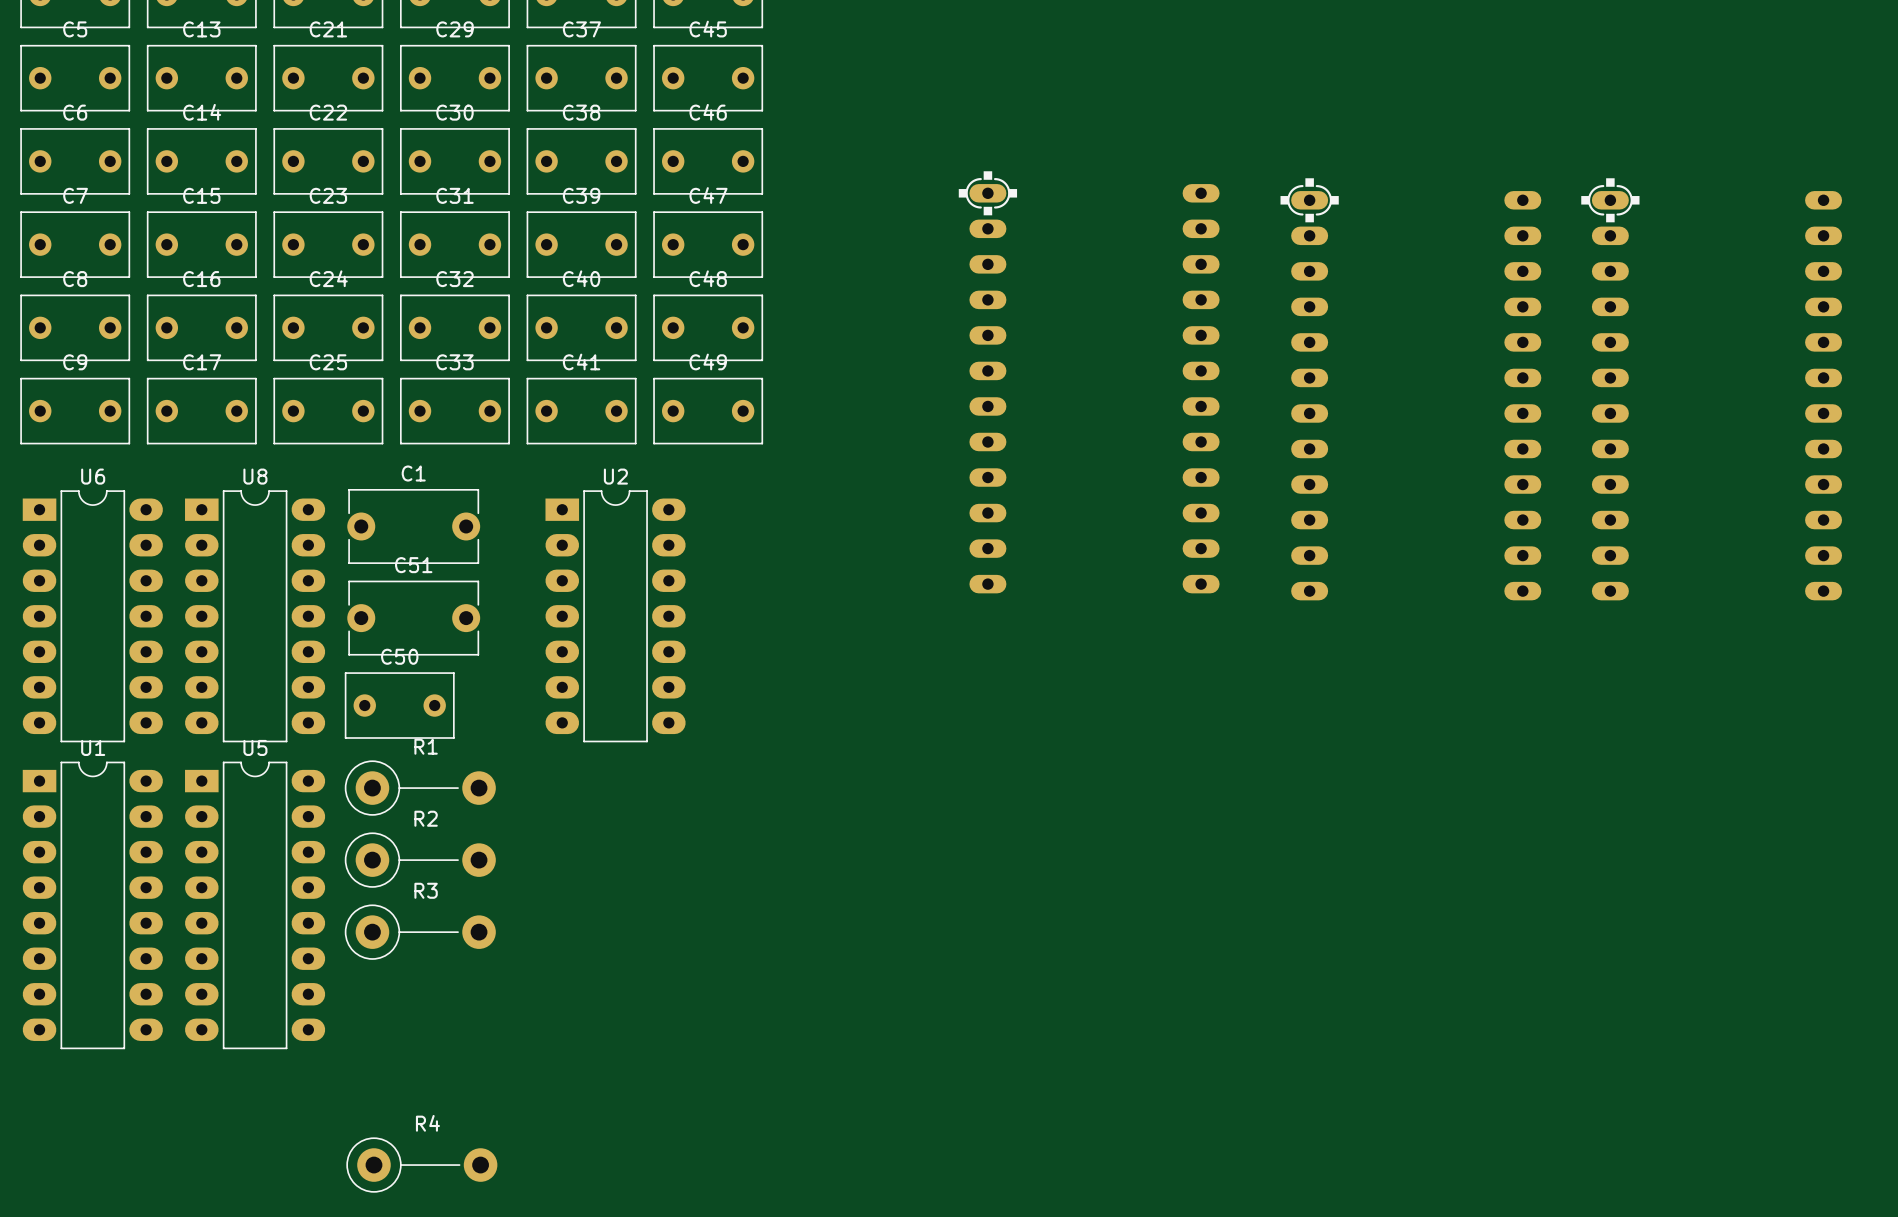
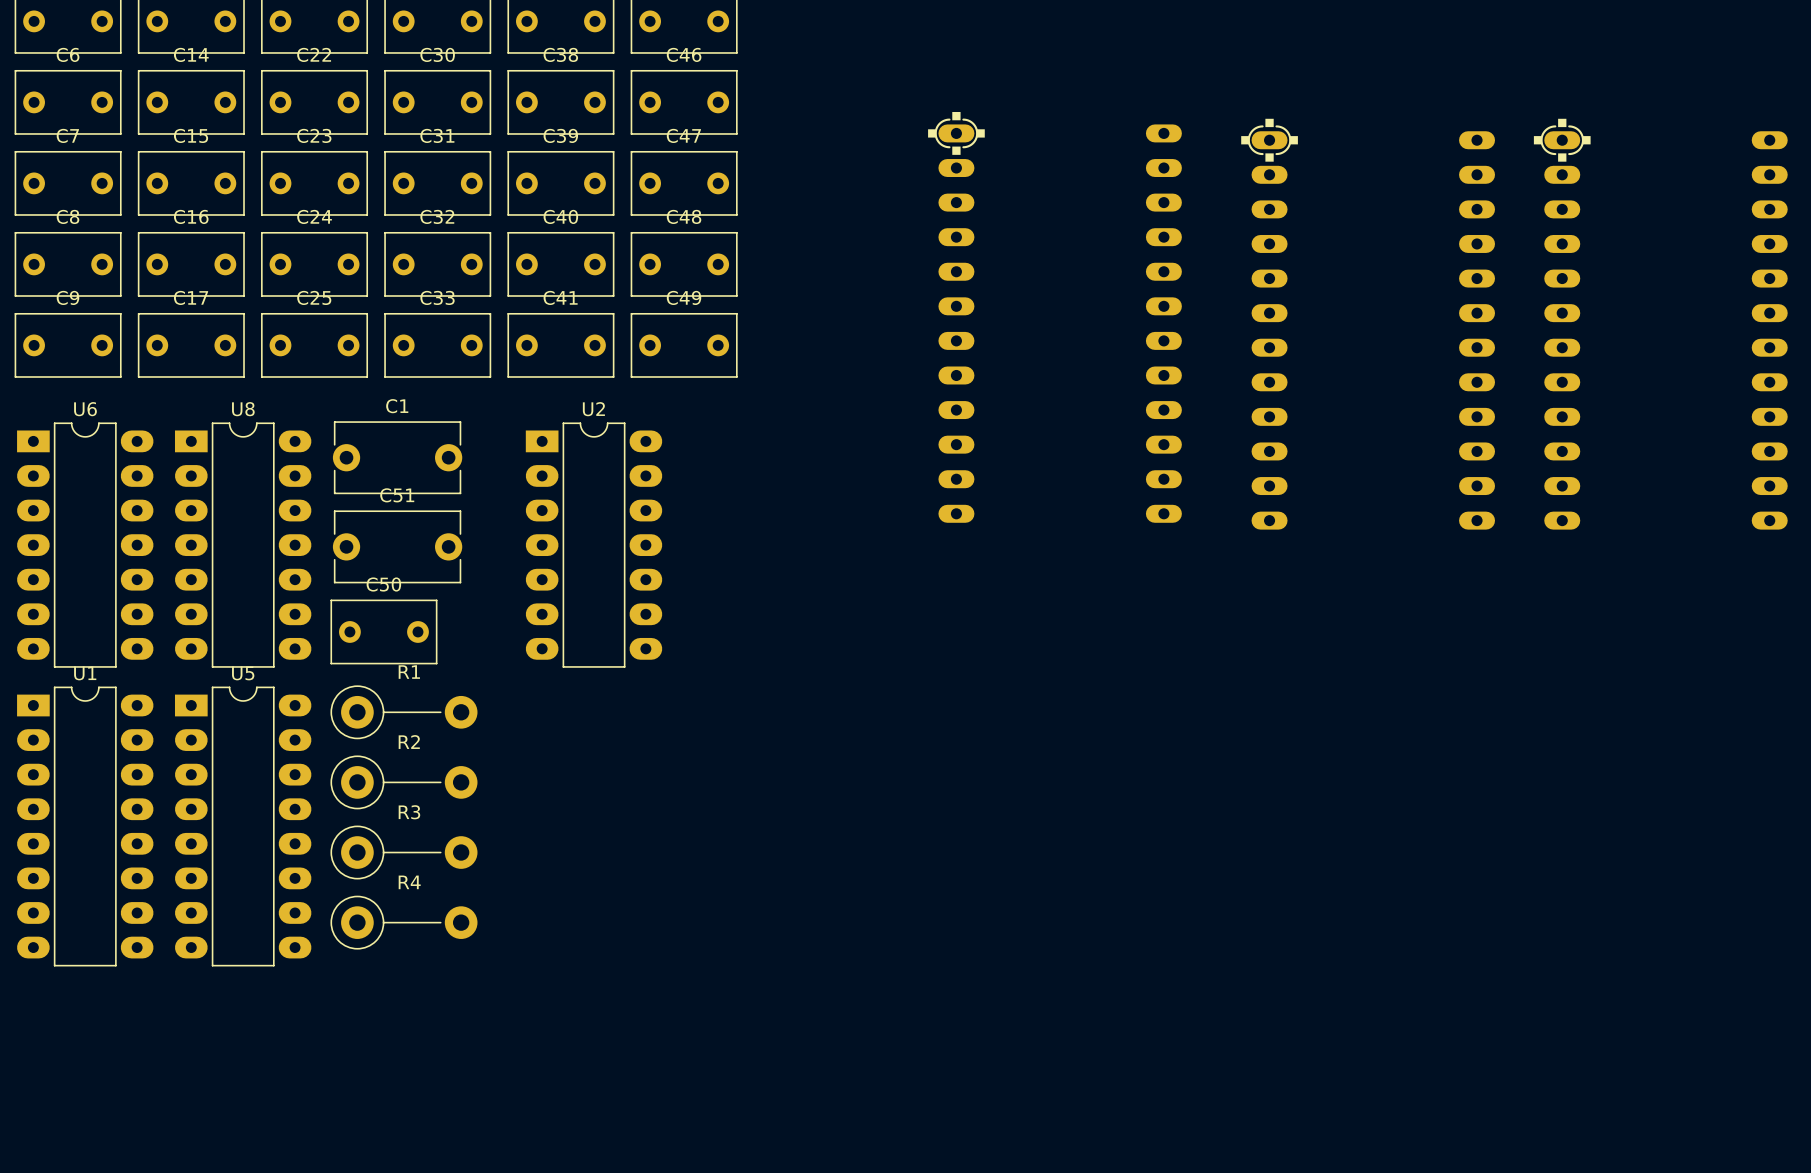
R4 position: (421, 1165) -> (403, 922)

